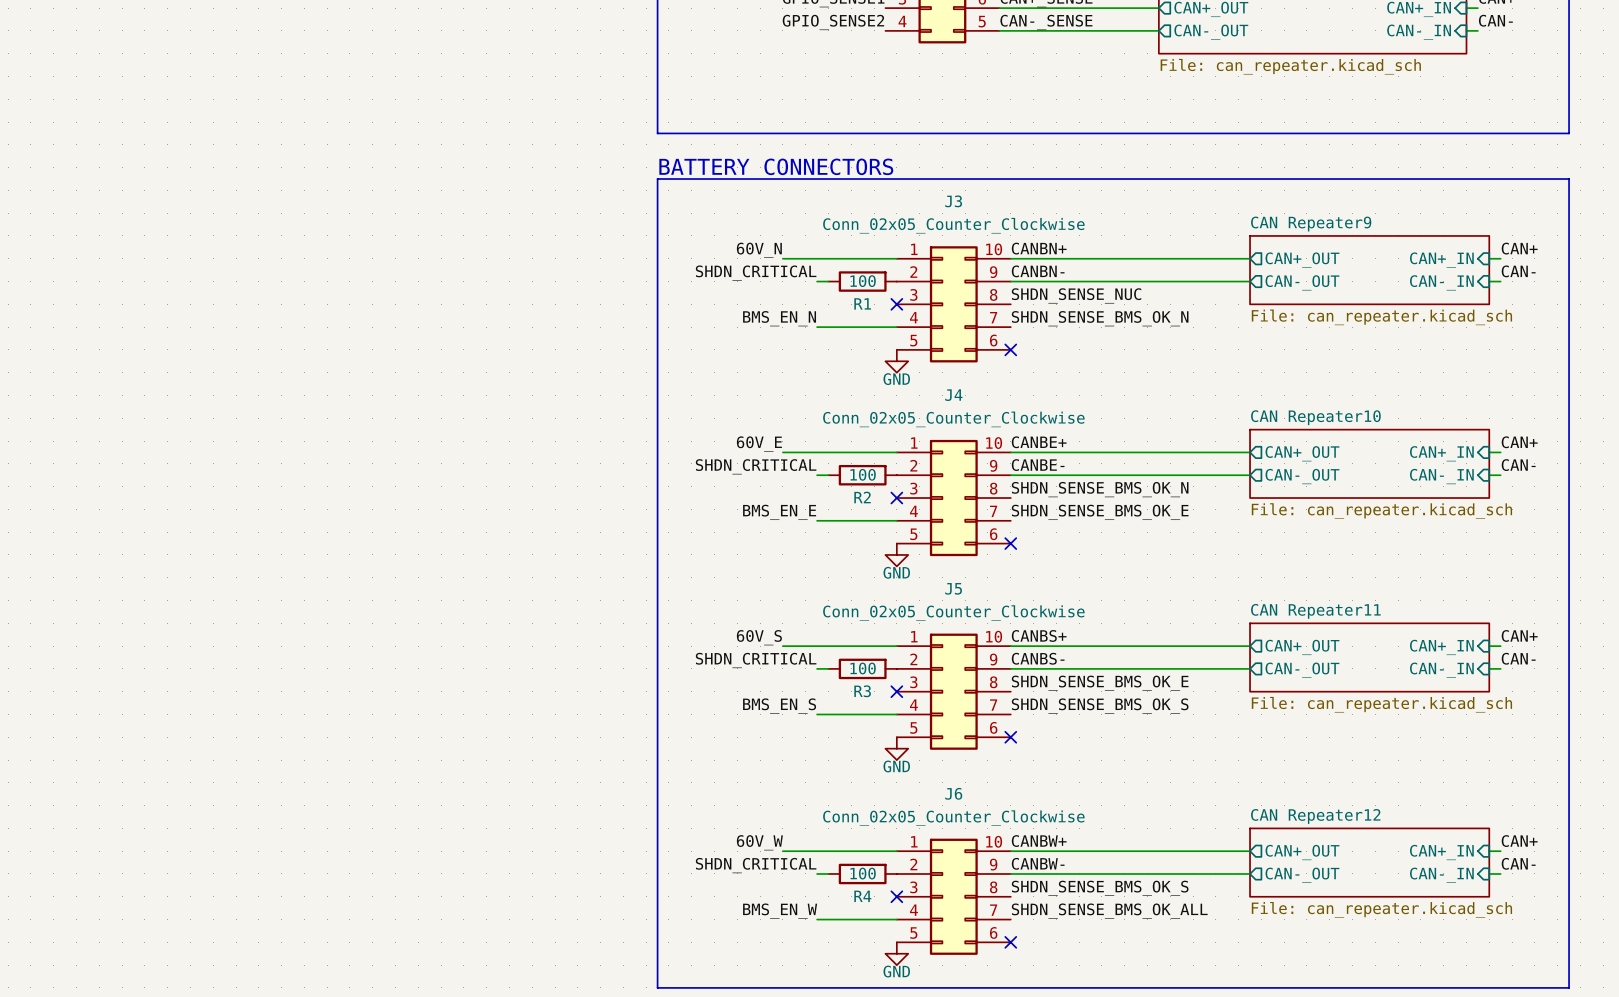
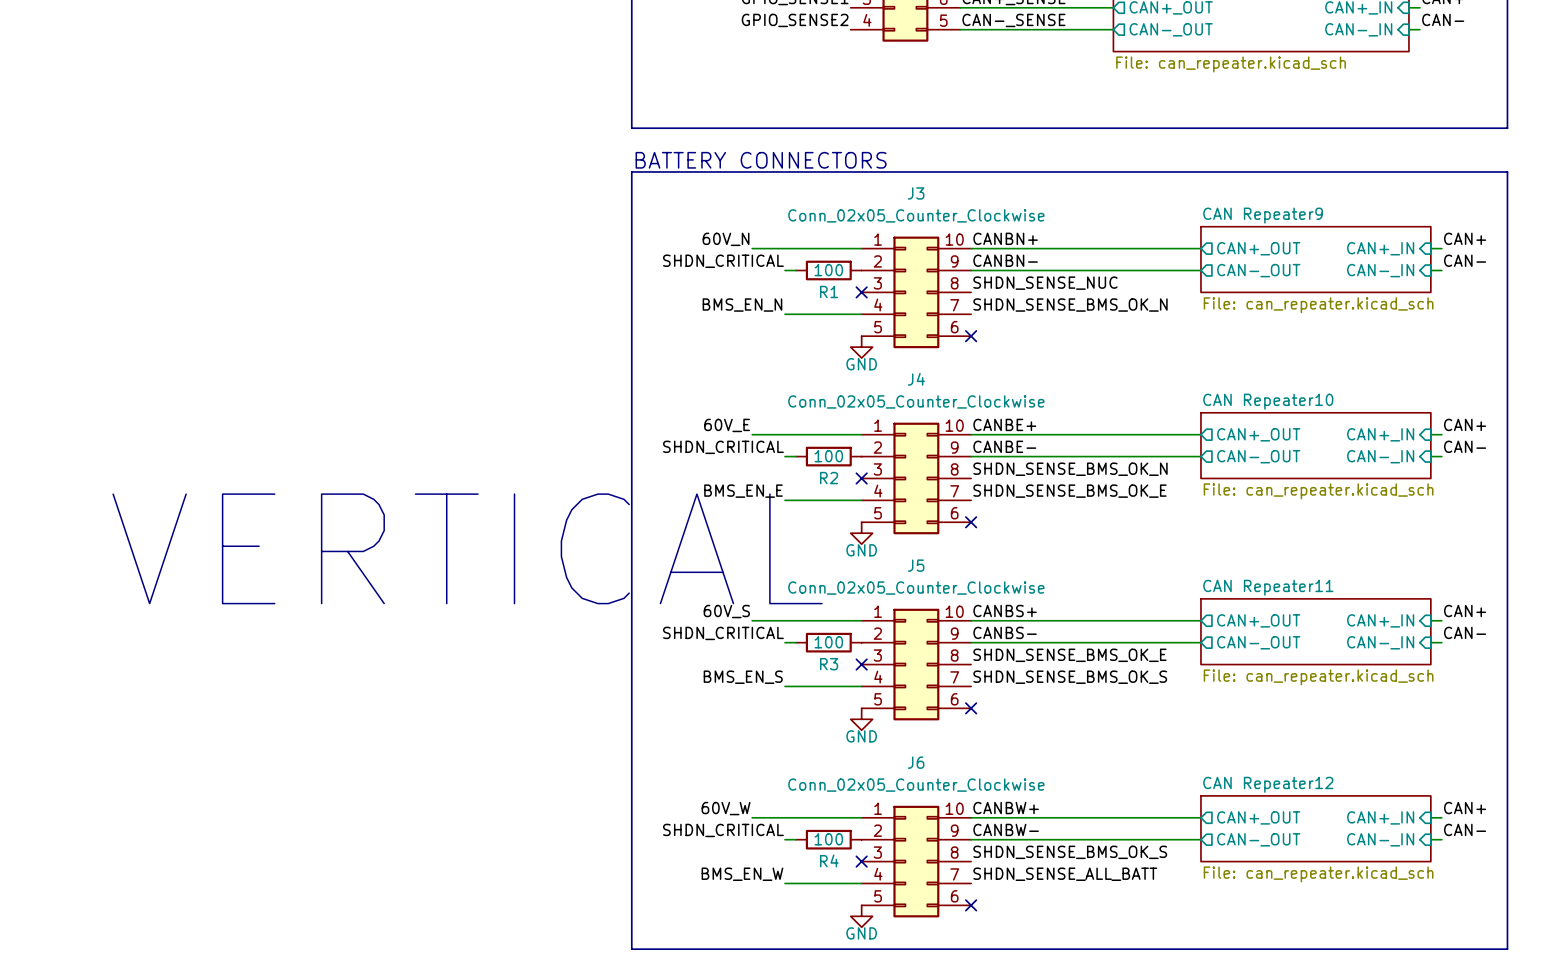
text: none -> VERTICAL (467, 548)
label: SHDN_SENSE_BMS_OK_ALL (1109, 911) -> SHDN_SENSE_ALL_BATT (1065, 874)

